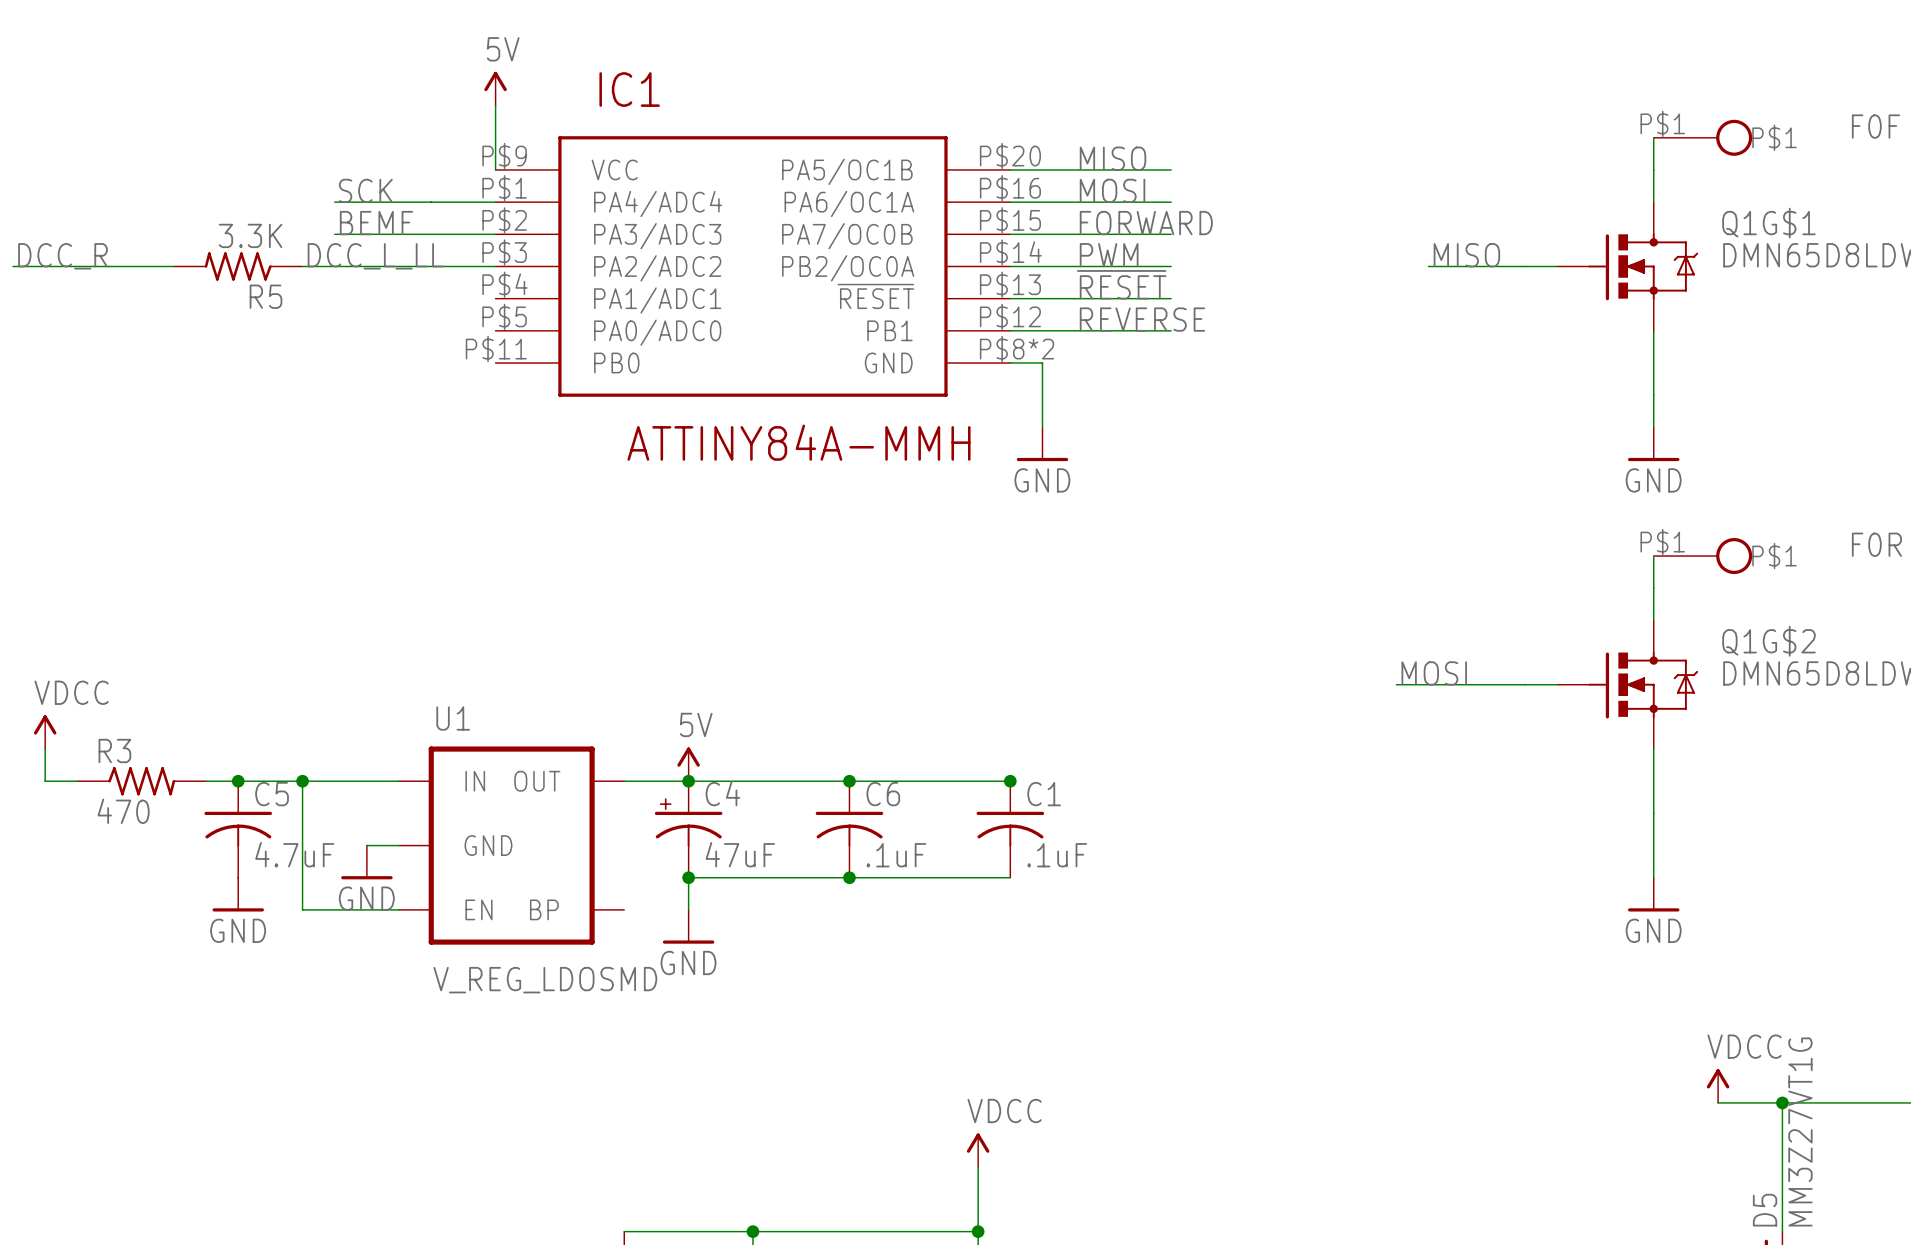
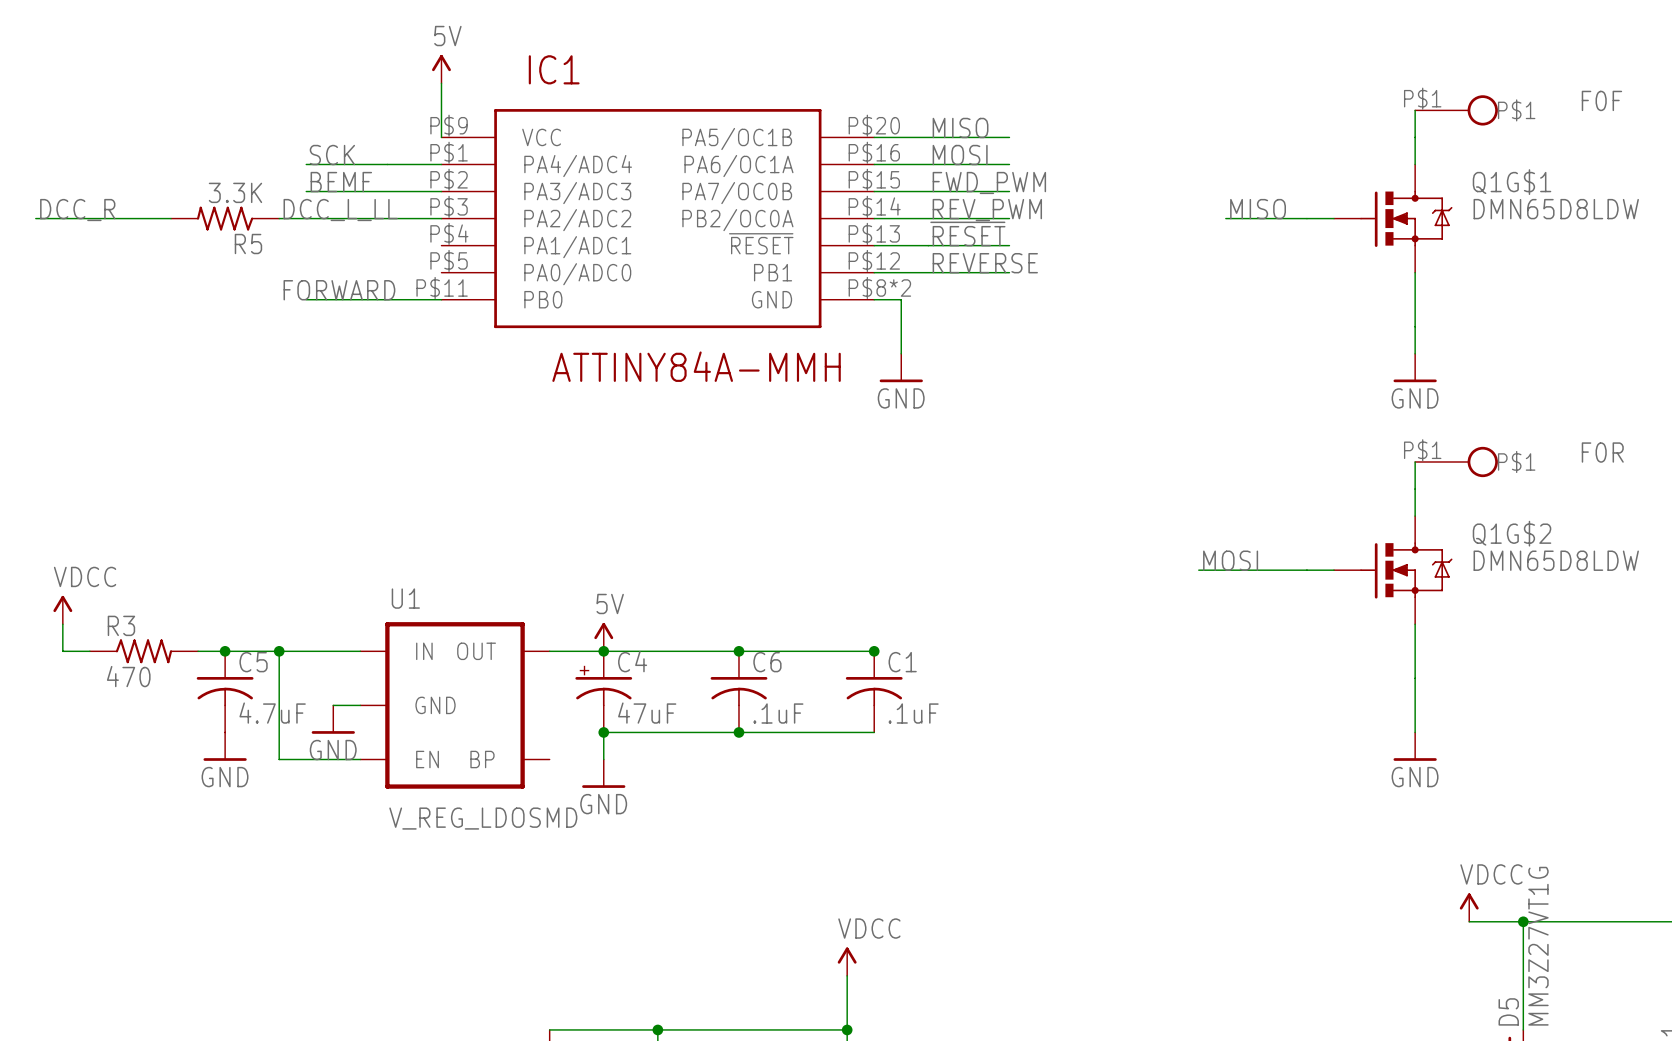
label: FORWARD (1146, 223) -> FWD_PWM (989, 182)
label: PWM (1109, 255) -> REV_PWM (987, 210)
label: none -> FORWARD (339, 290)
wire: none -> (306, 299) (441, 299)

